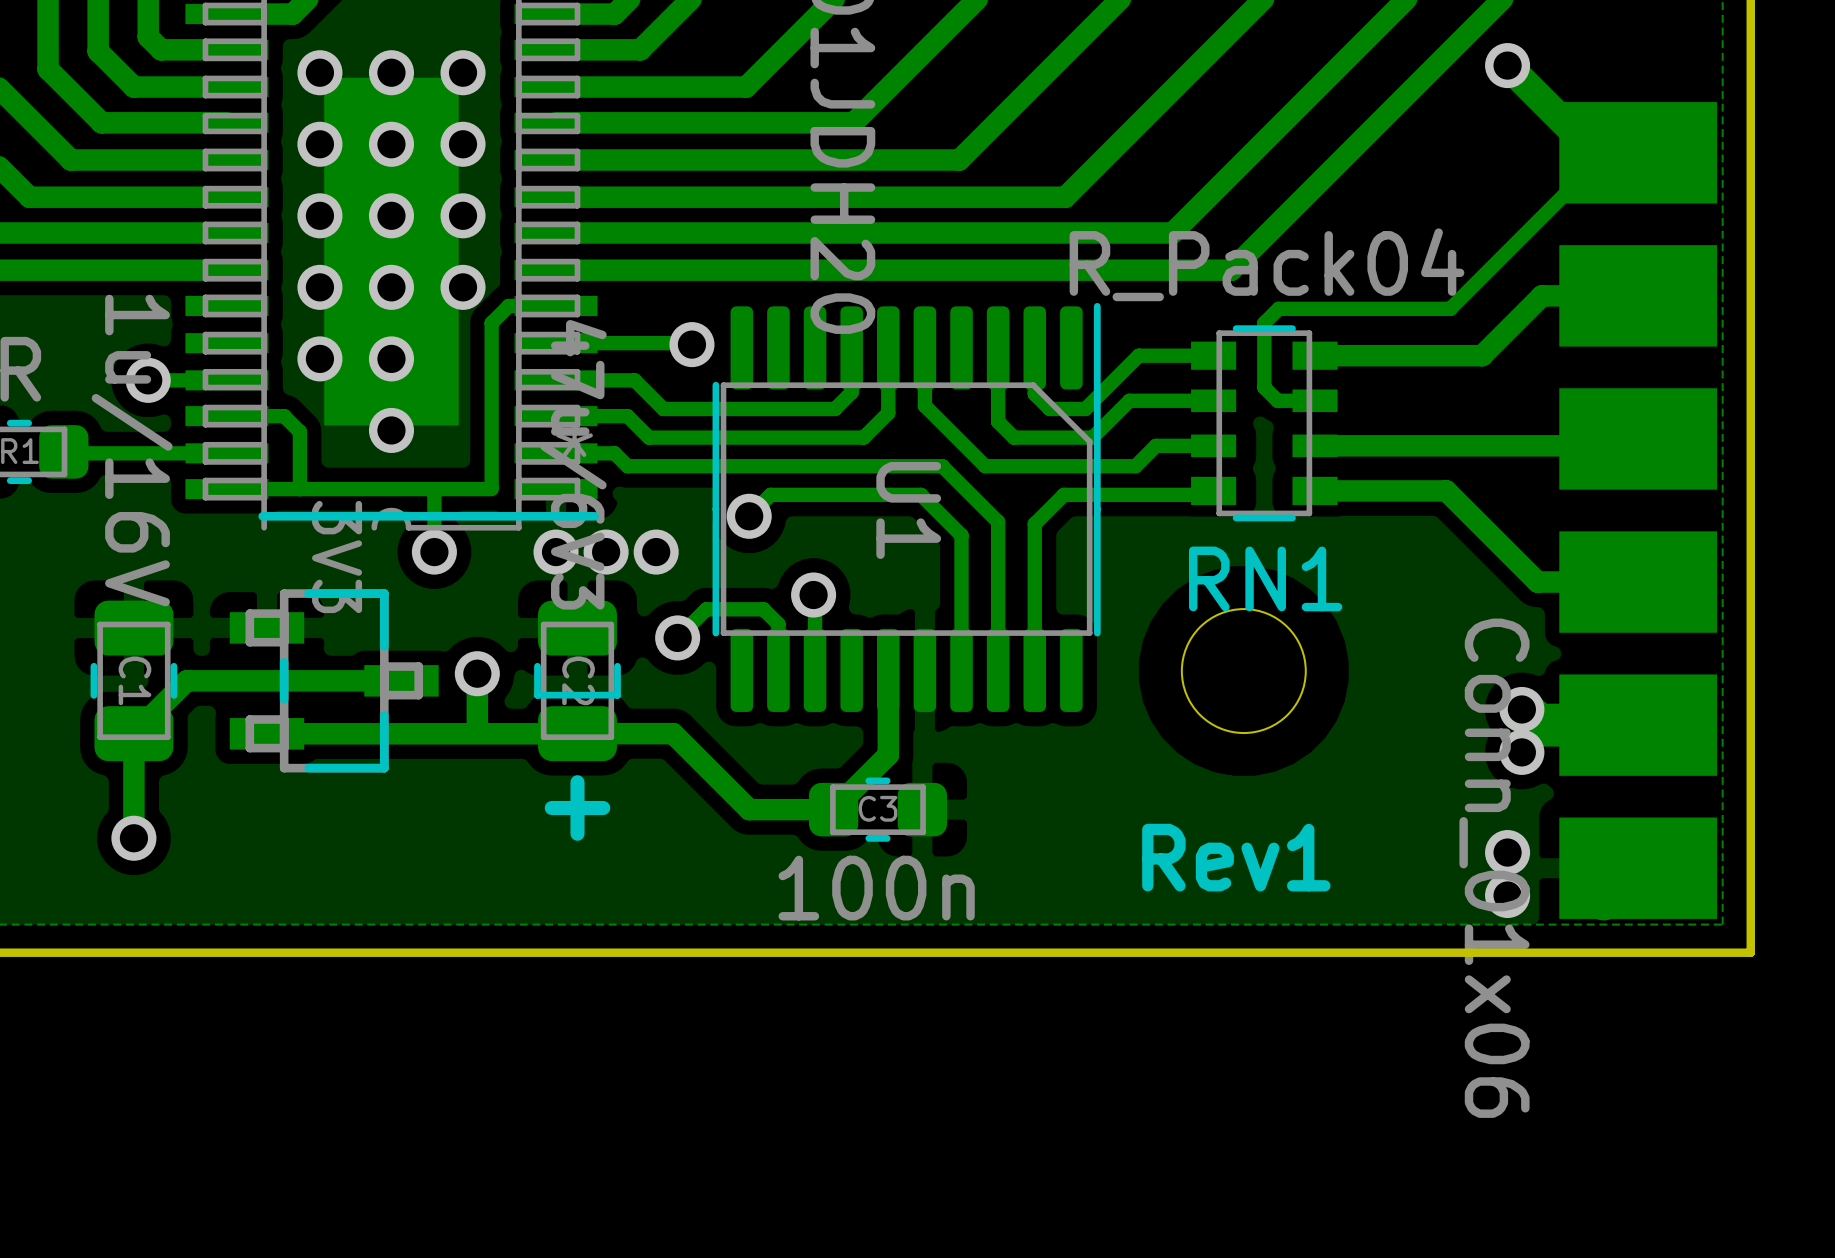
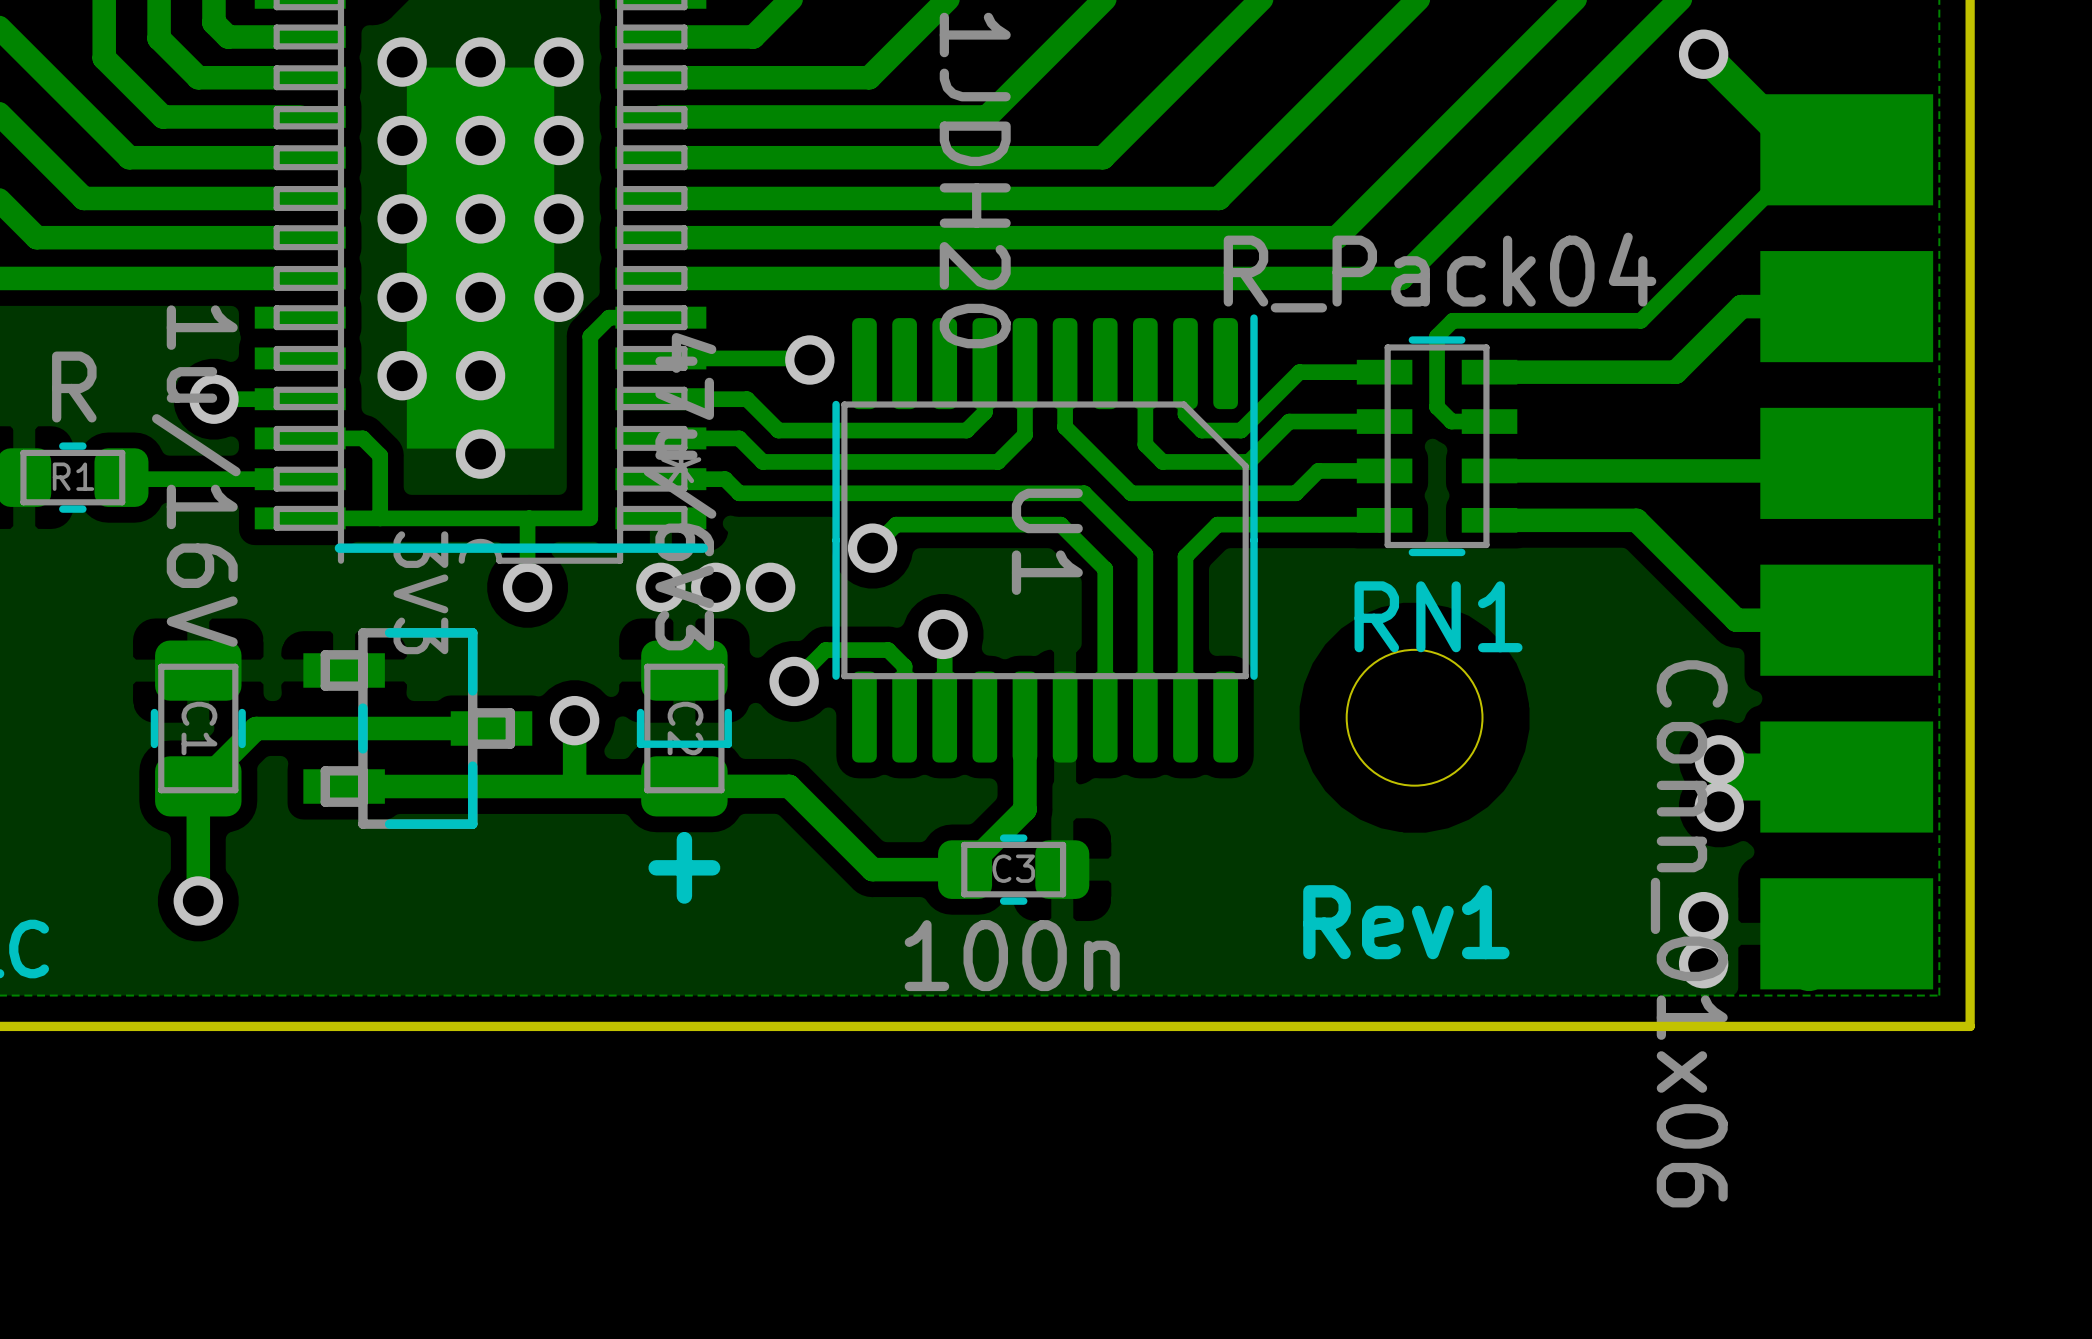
RN1 footprint: [1191, 325, 1338, 522] -> [1356, 336, 1518, 557]

